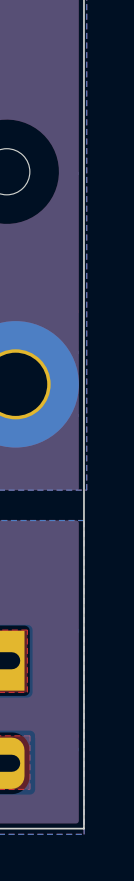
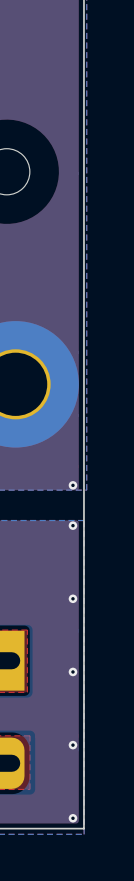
via: none -> (72, 485)
via: none -> (72, 525)
via: none -> (72, 598)
via: none -> (72, 671)
via: none -> (72, 745)
via: none -> (72, 818)

